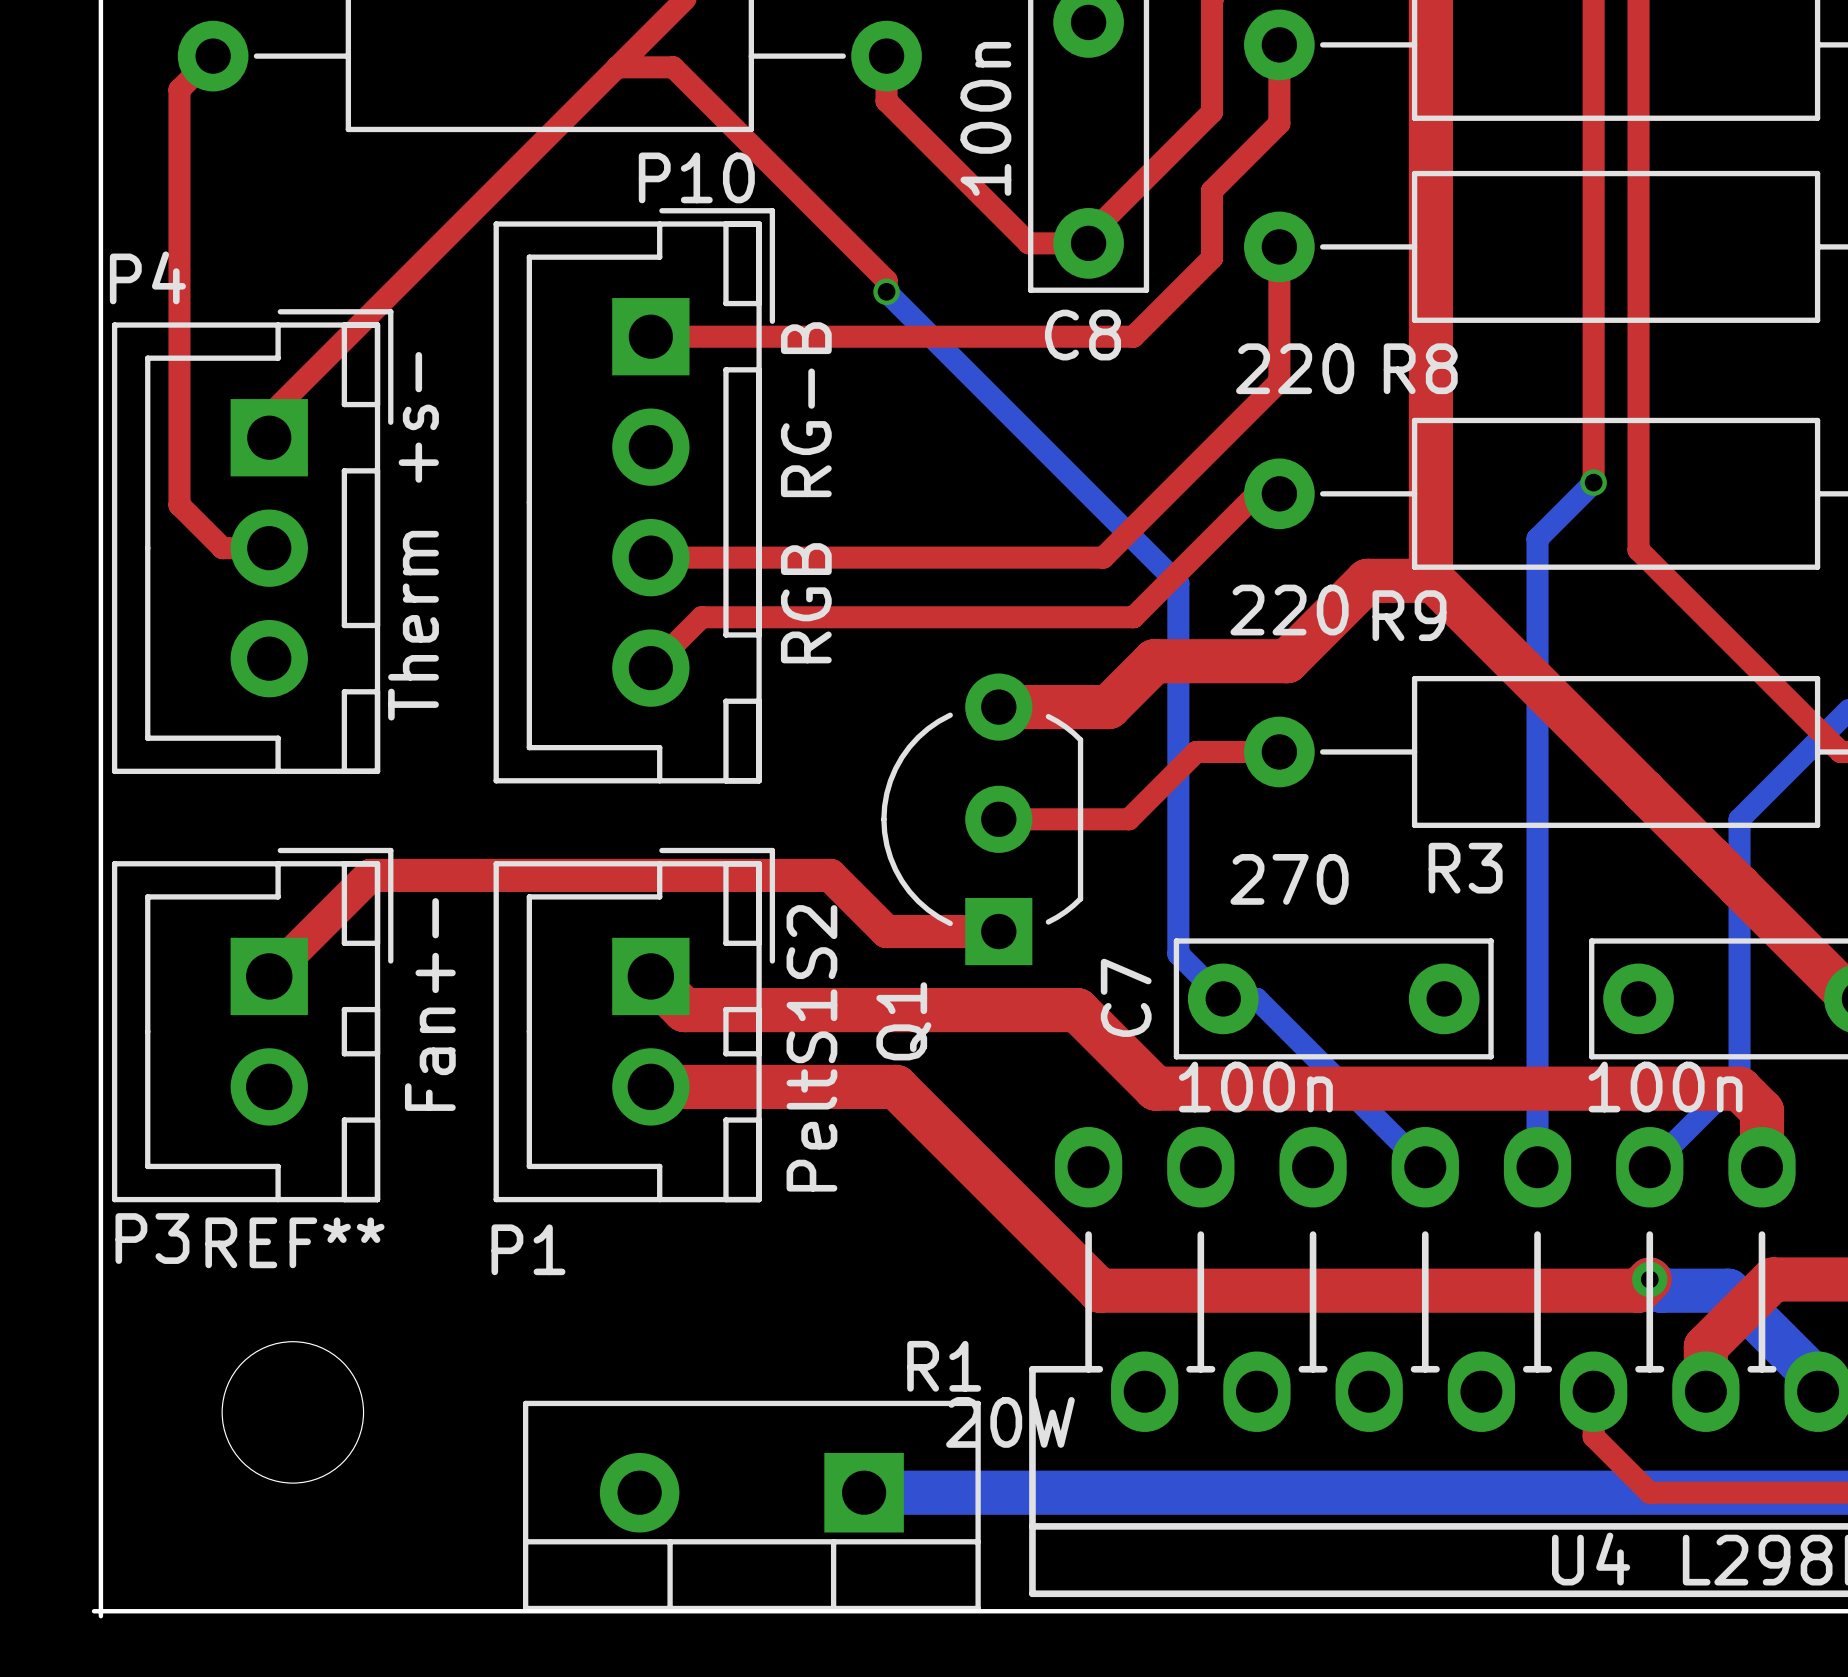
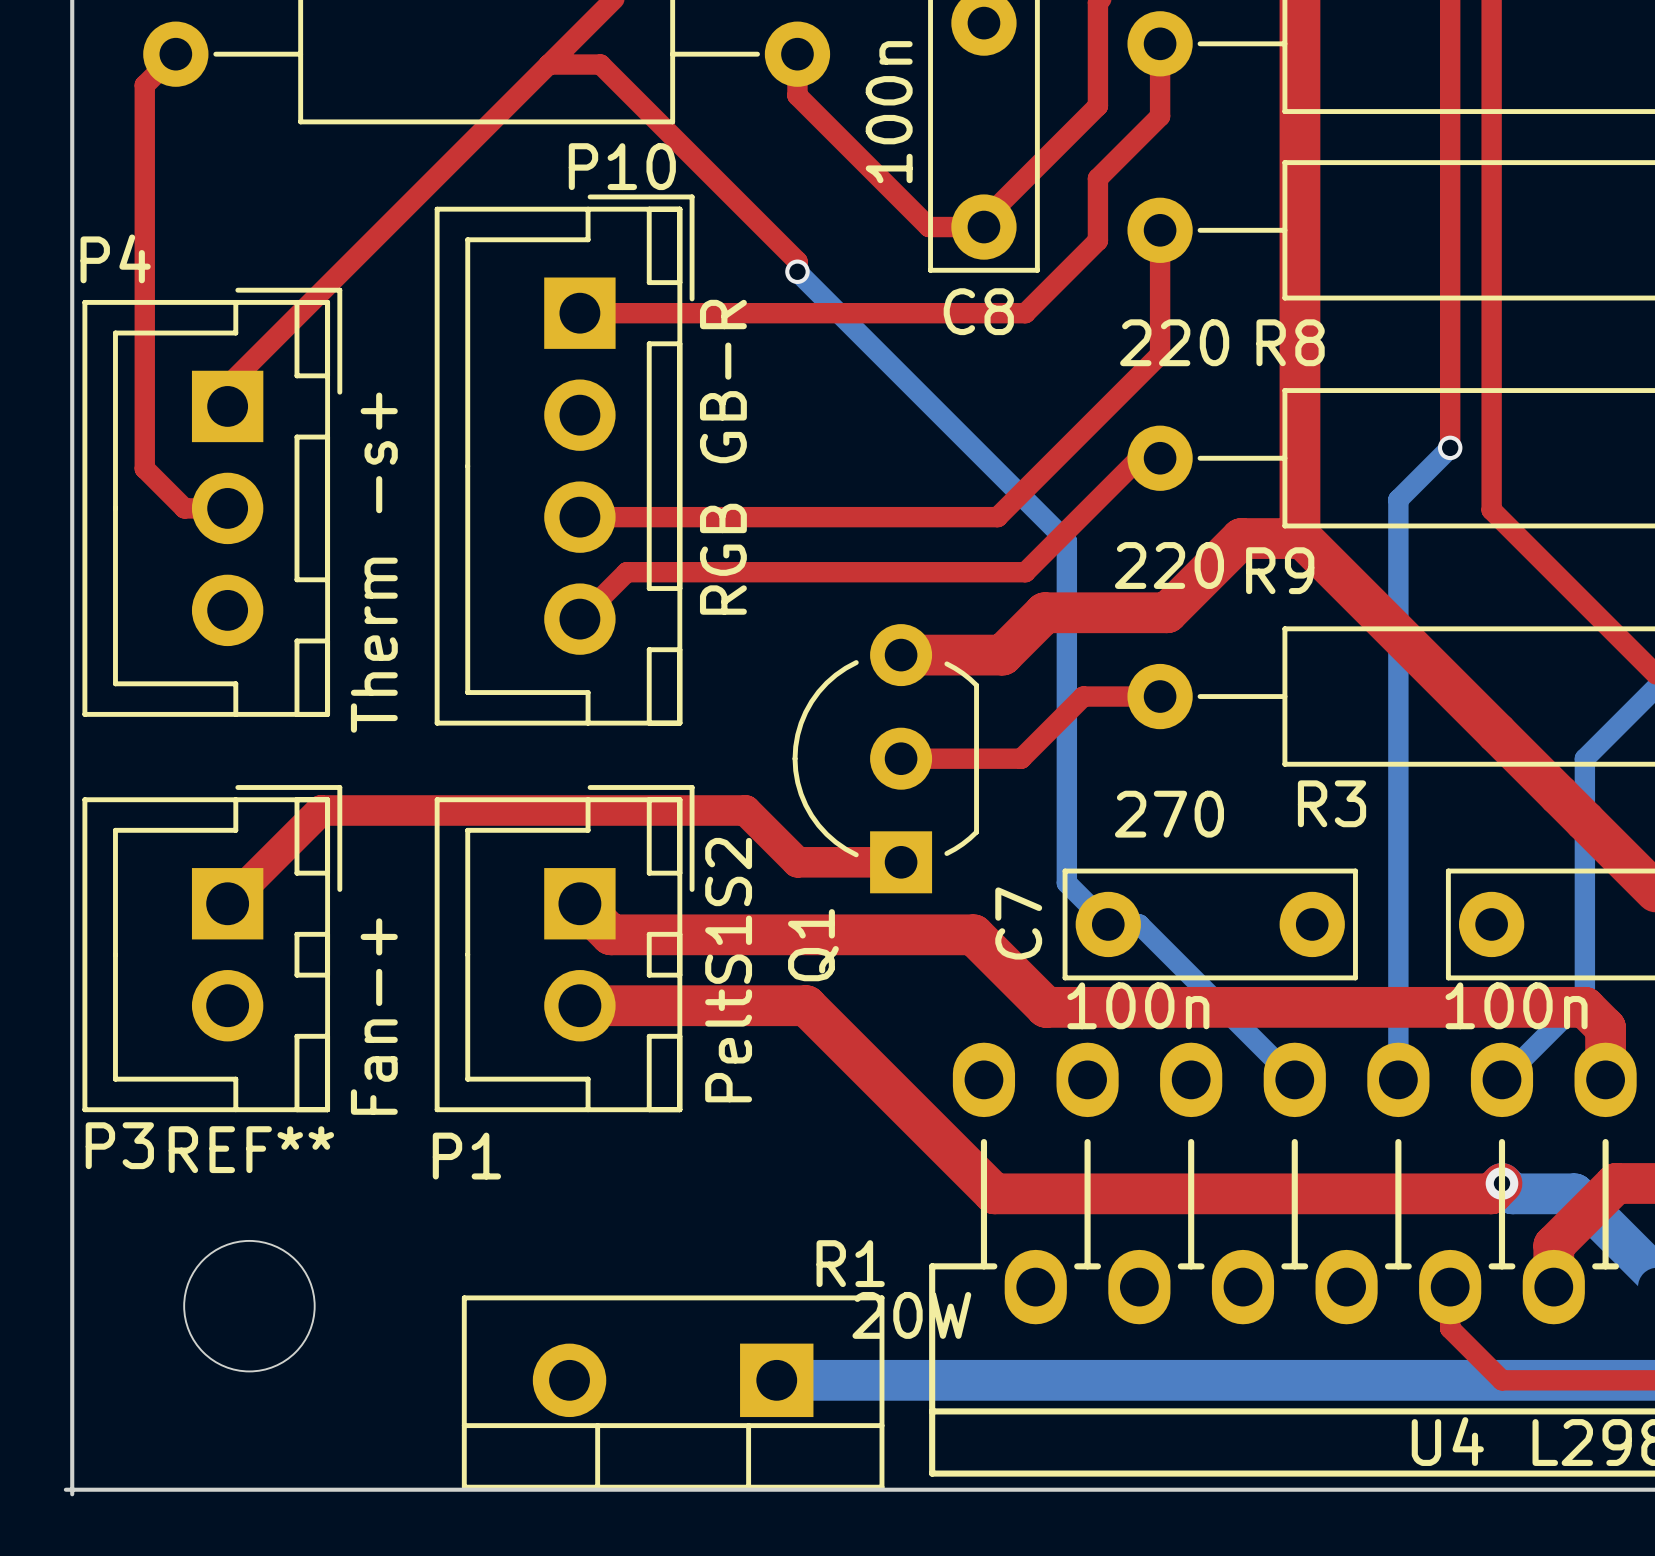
P10 value: RGB RG-B (806, 492) -> RGB GB-R (723, 457)
P4 value: Therm +s- (413, 536) -> Therm -s+ (374, 562)
P3 value: Fan+- (430, 1004) -> Fan-+ (374, 1016)

